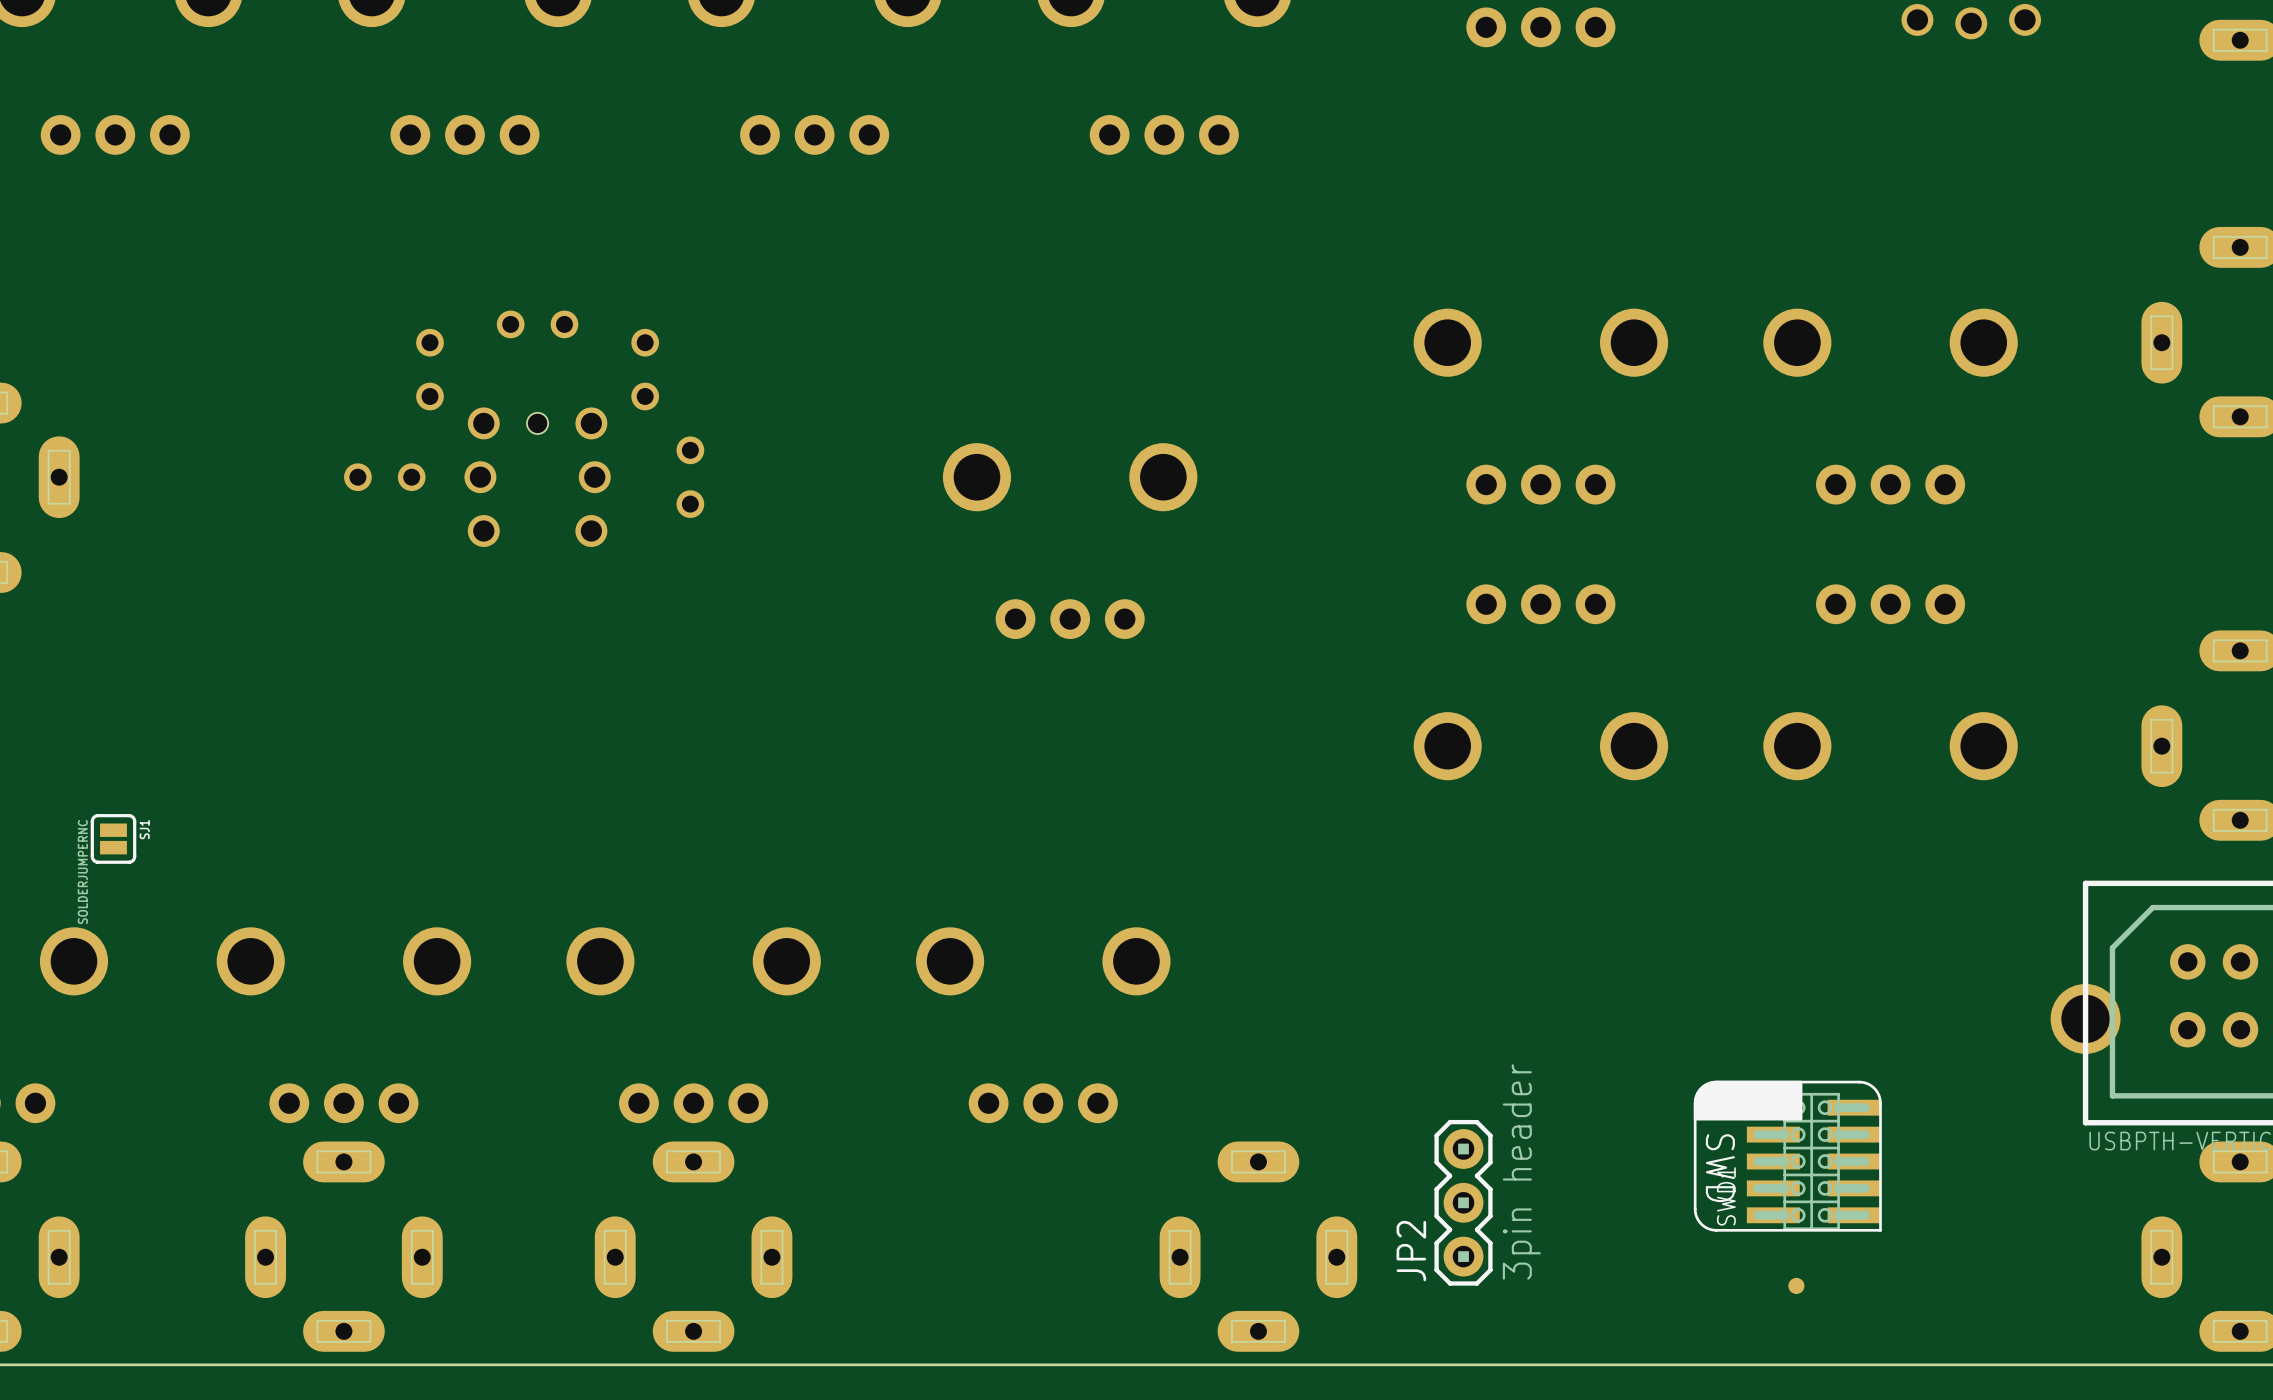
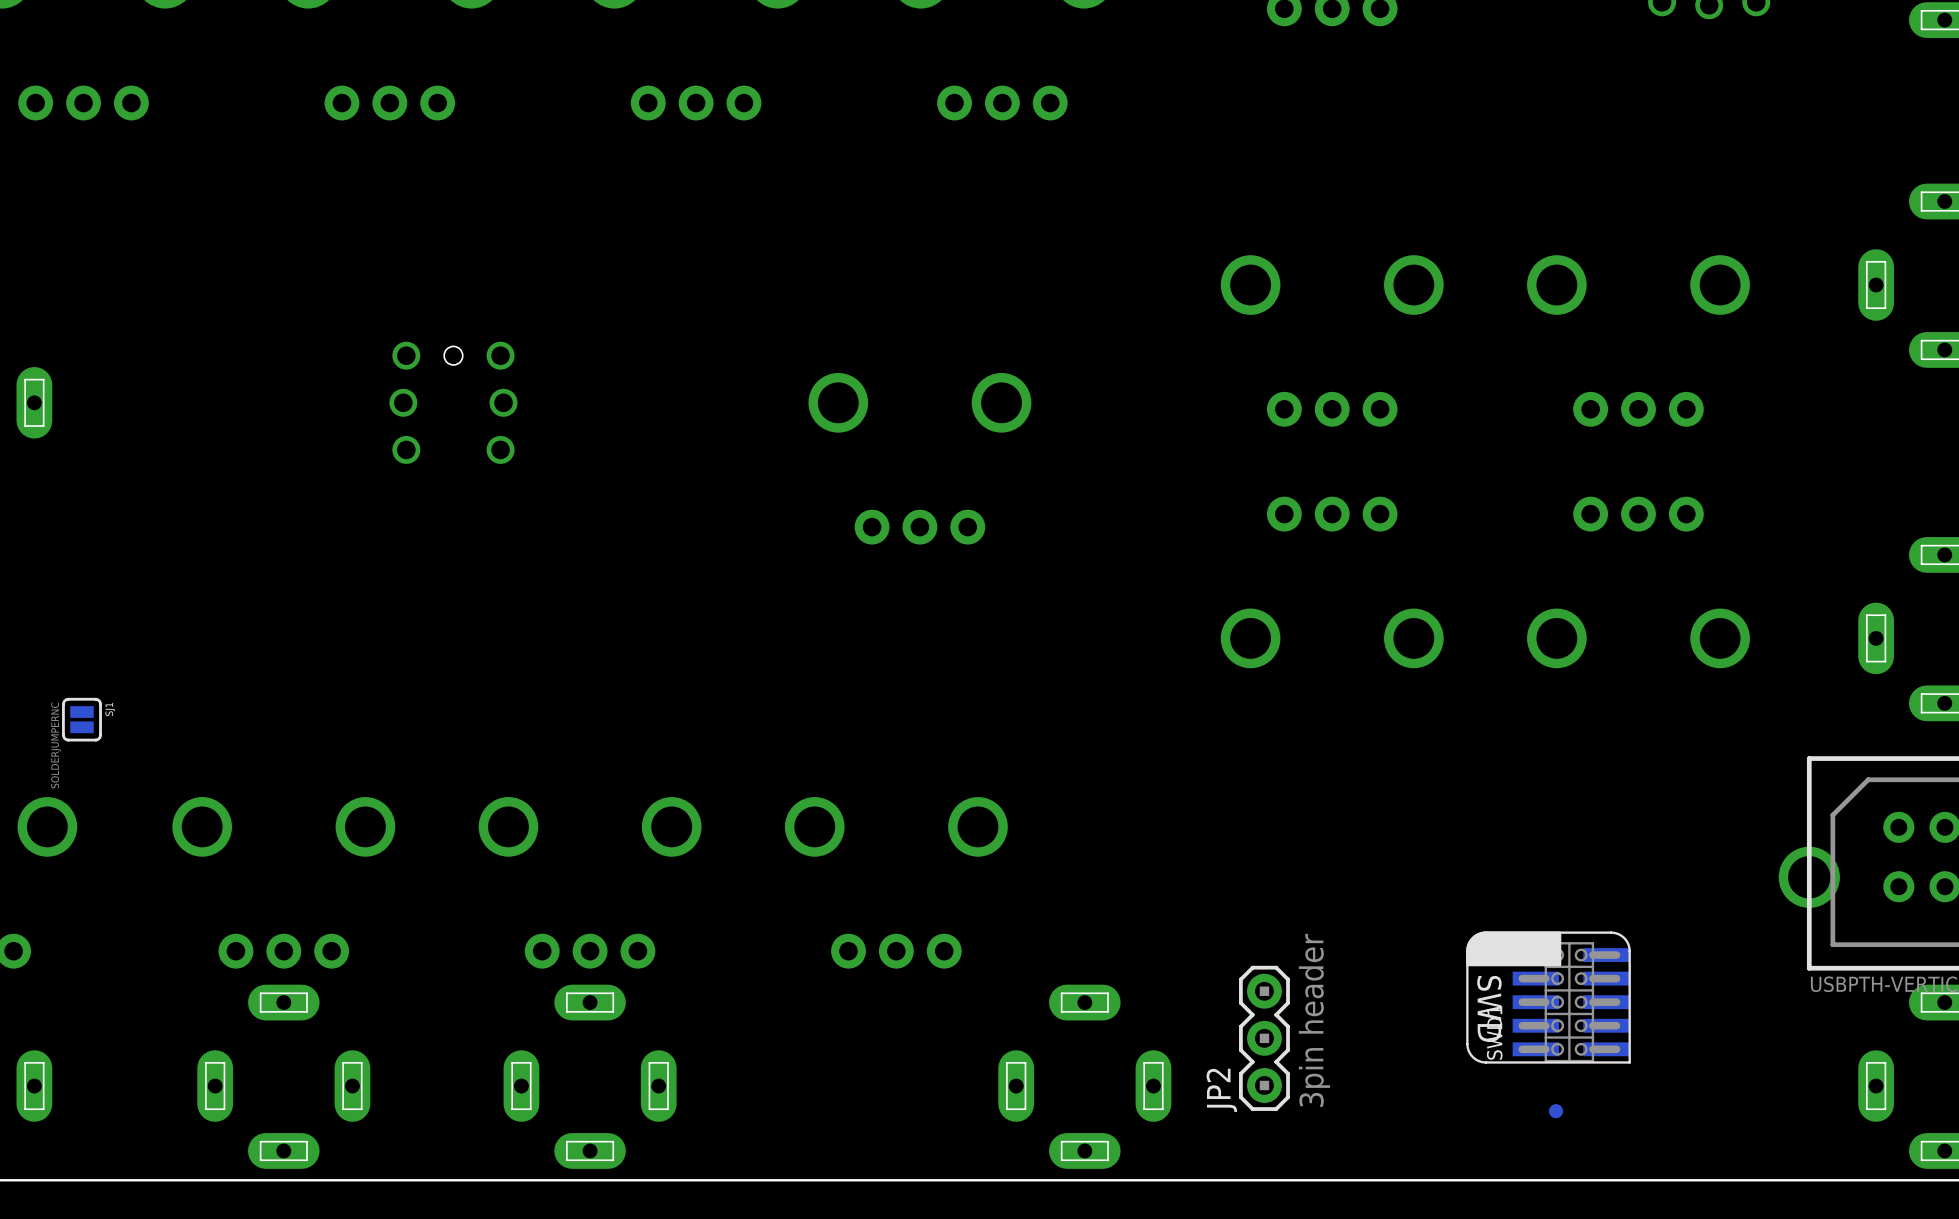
part: (537, 324) -> none
part: (430, 369) -> none
part: (645, 369) -> none
part: (384, 477) -> none
part: (690, 477) -> none

